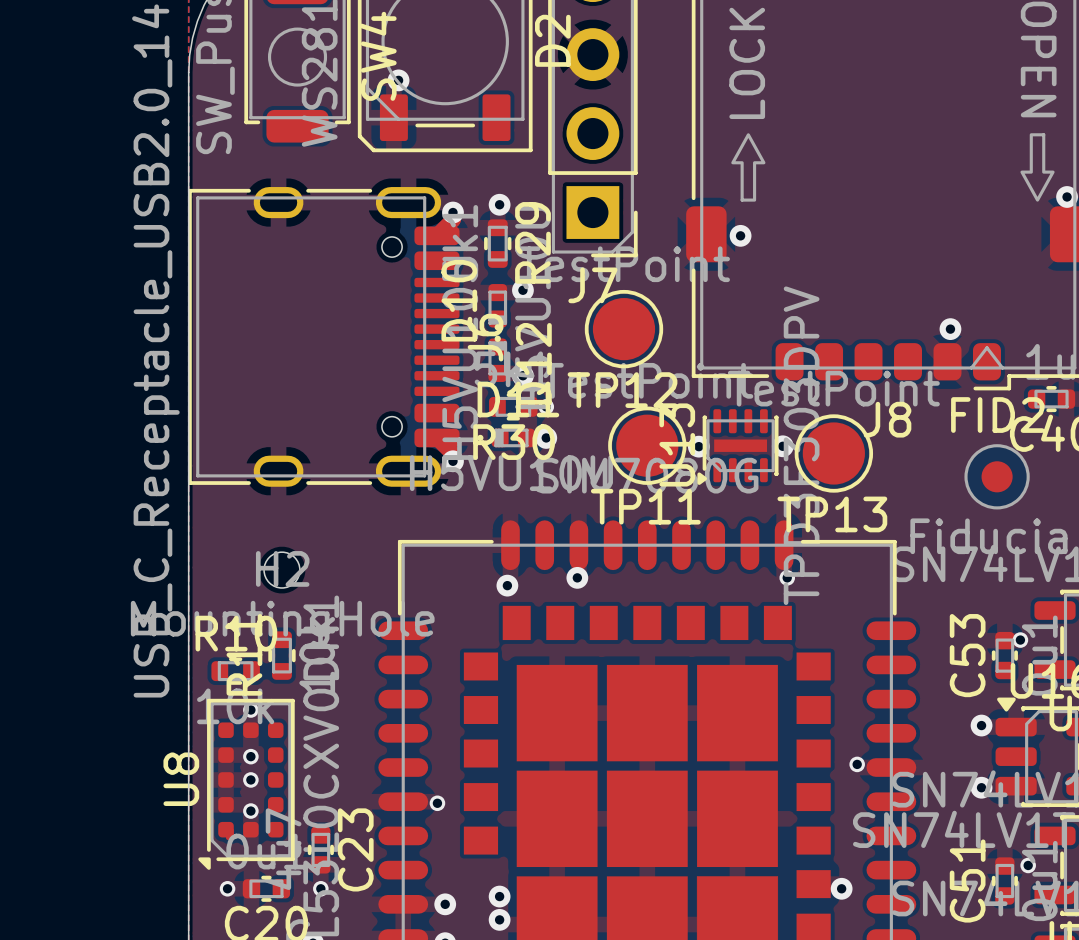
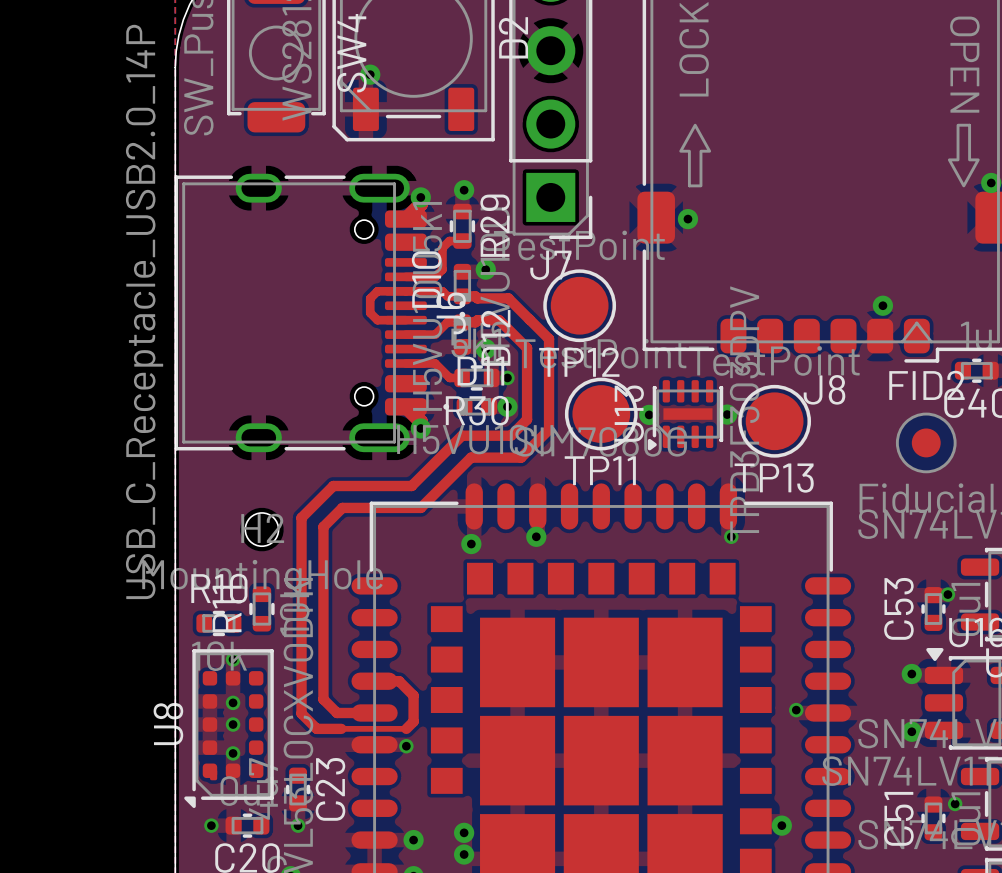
top track: none -> (462, 241) (449, 241) (442, 247) (442, 269) (435, 276) (405, 276)
top track: none -> (405, 320) (377, 320) (370, 312) (370, 298) (377, 291) (442, 291) (447, 296) (508, 298) (549, 338) (549, 429) (521, 457) (471, 457) (420, 507) (342, 507) (323, 526) (323, 699) (337, 712) (374, 712)
top track: none -> (405, 334) (435, 334) (447, 322) (499, 320) (527, 348) (527, 419) (510, 435) (462, 435) (411, 486) (333, 486) (301, 517) (301, 713) (316, 728) (406, 728) (413, 721) (413, 695) (399, 681) (374, 681)
top track: none -> (405, 363) (435, 363) (449, 377) (462, 377)

